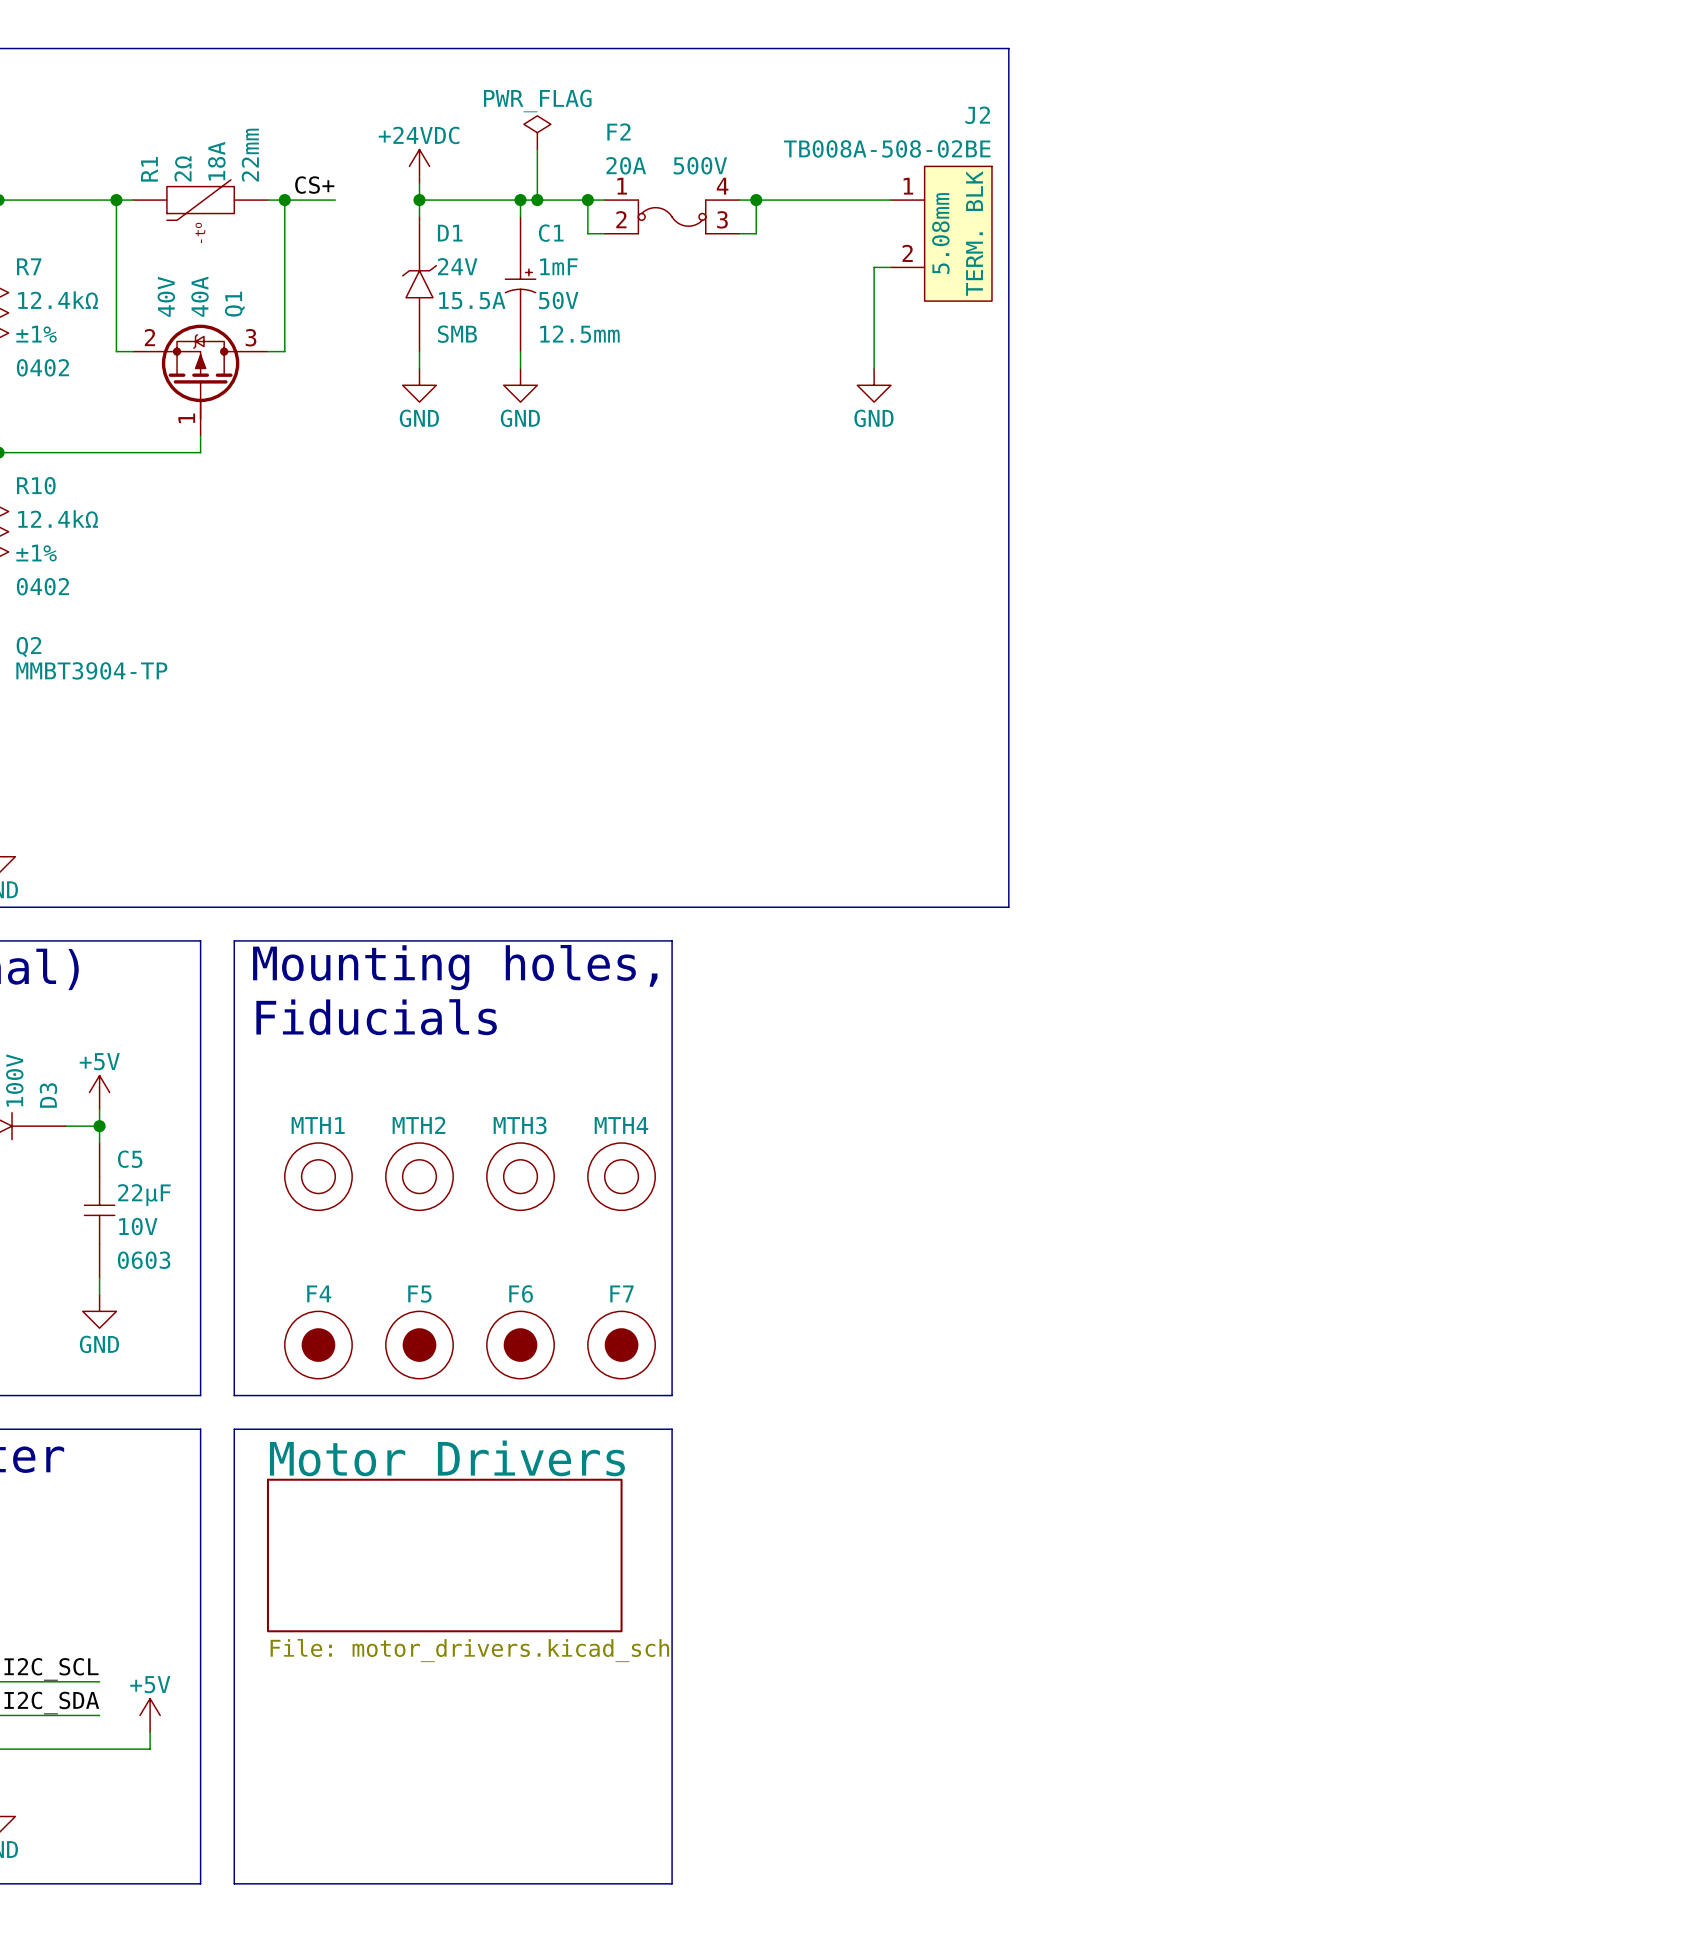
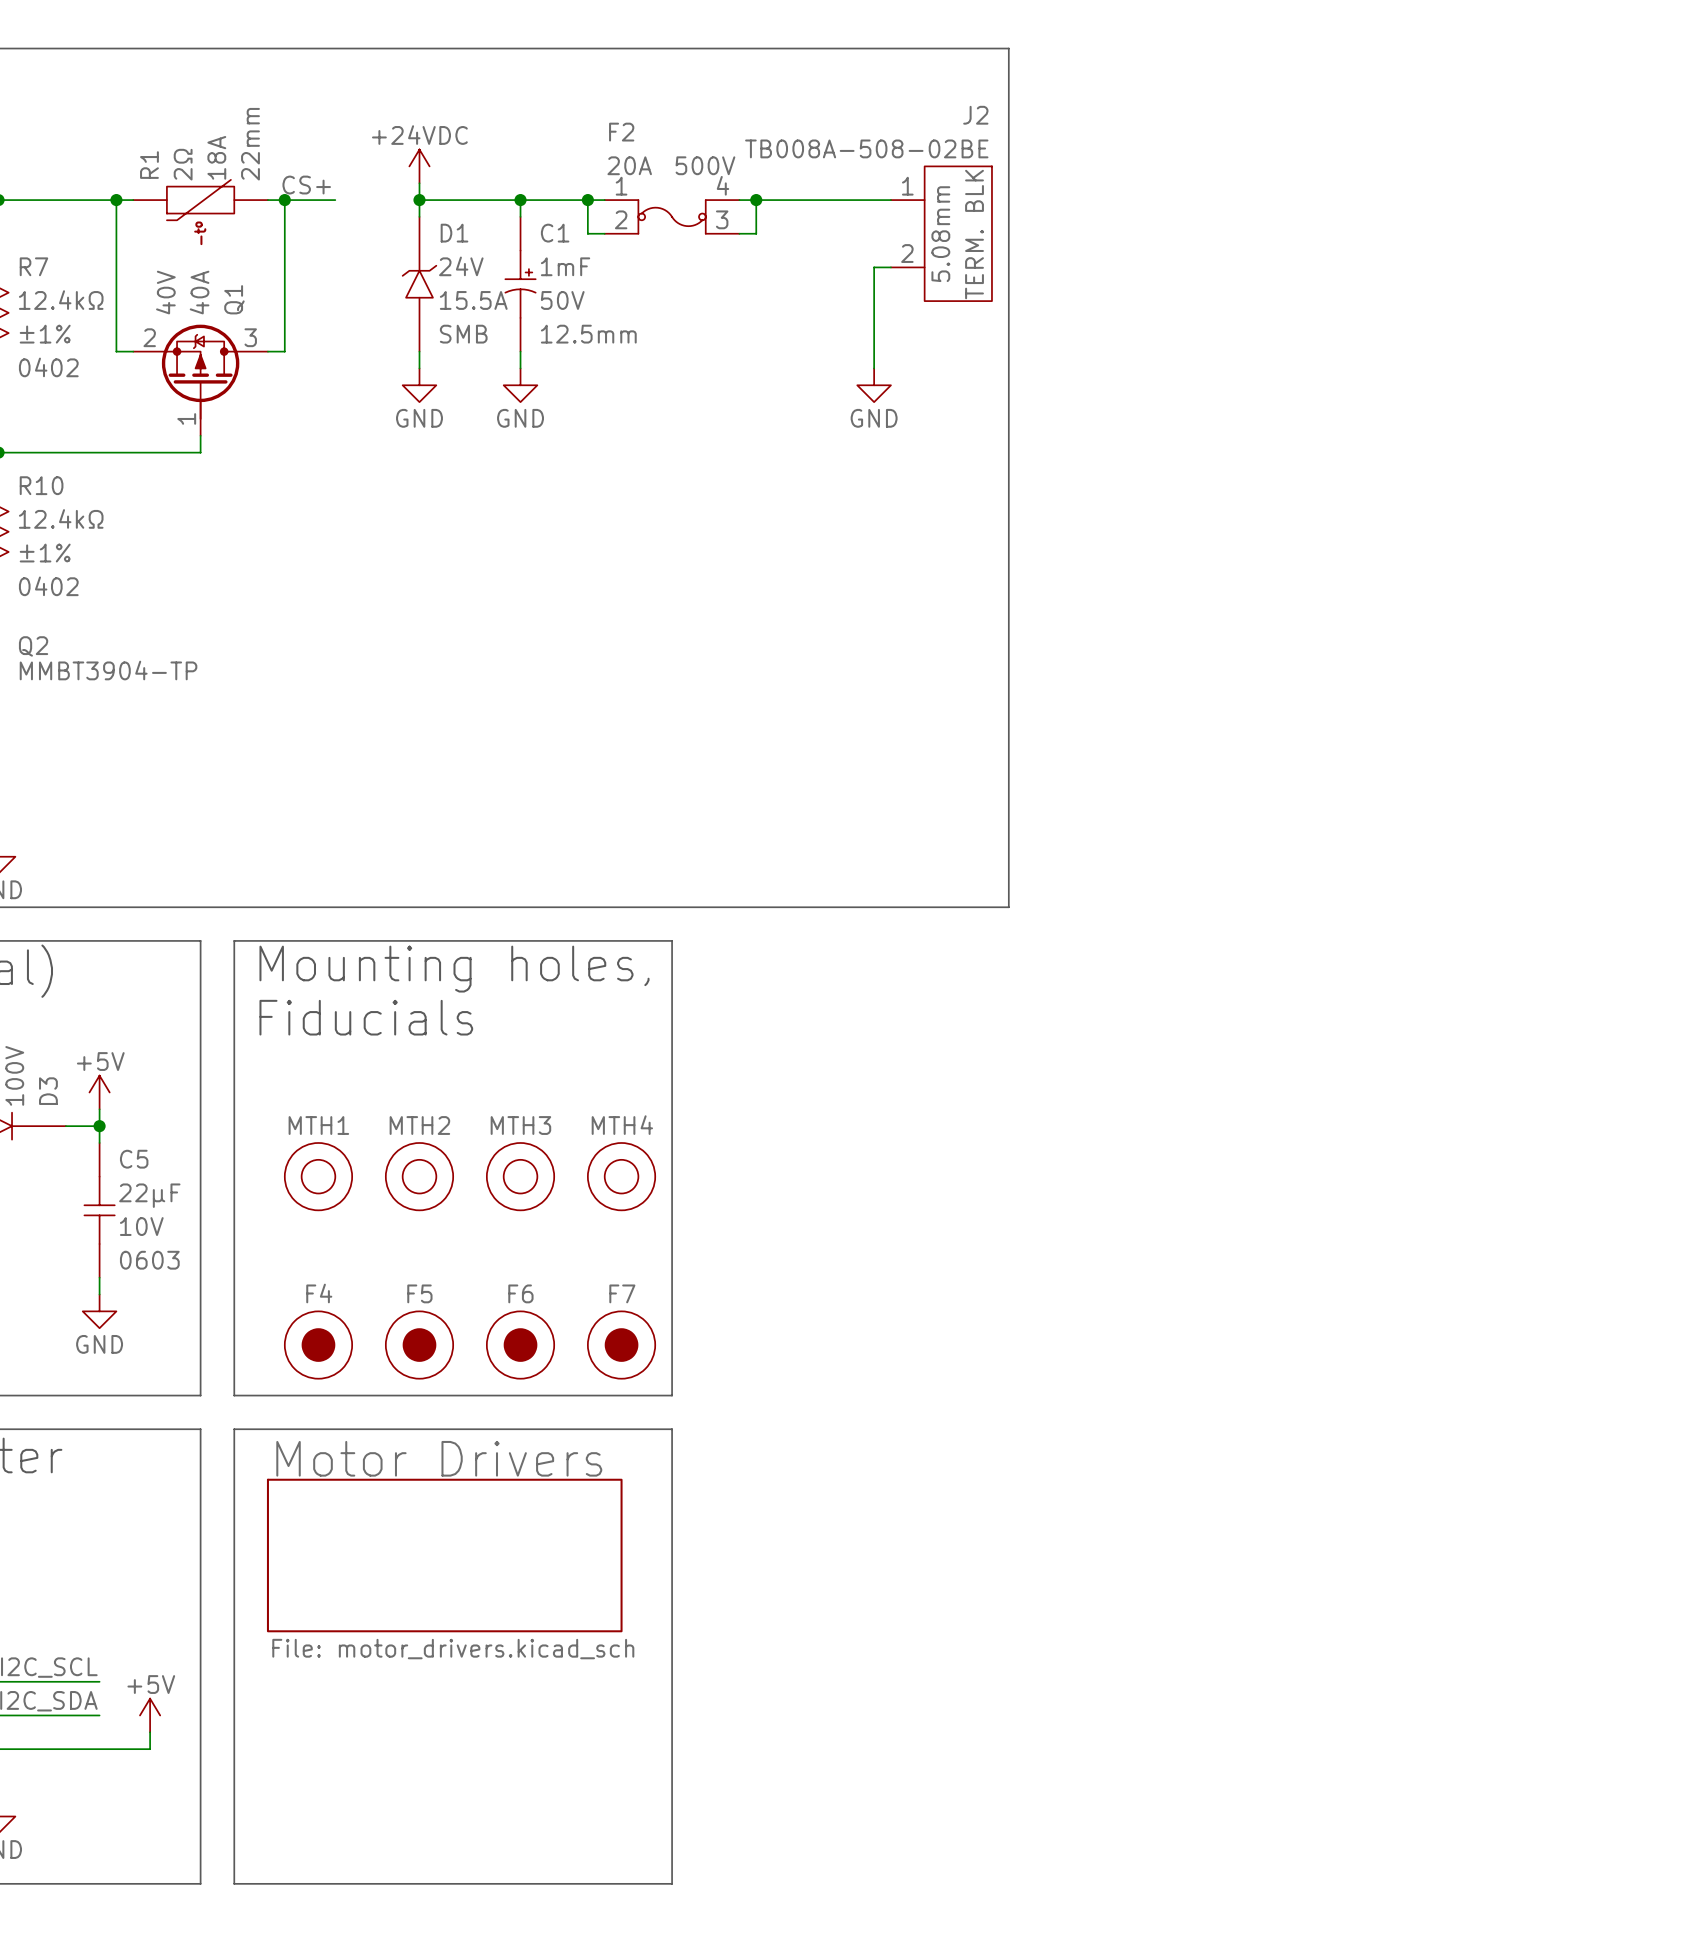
power symbol: PWR_FLAG (537, 132) -> none
wire: (537, 149) (537, 200) -> none
junction: (537, 200) -> none

